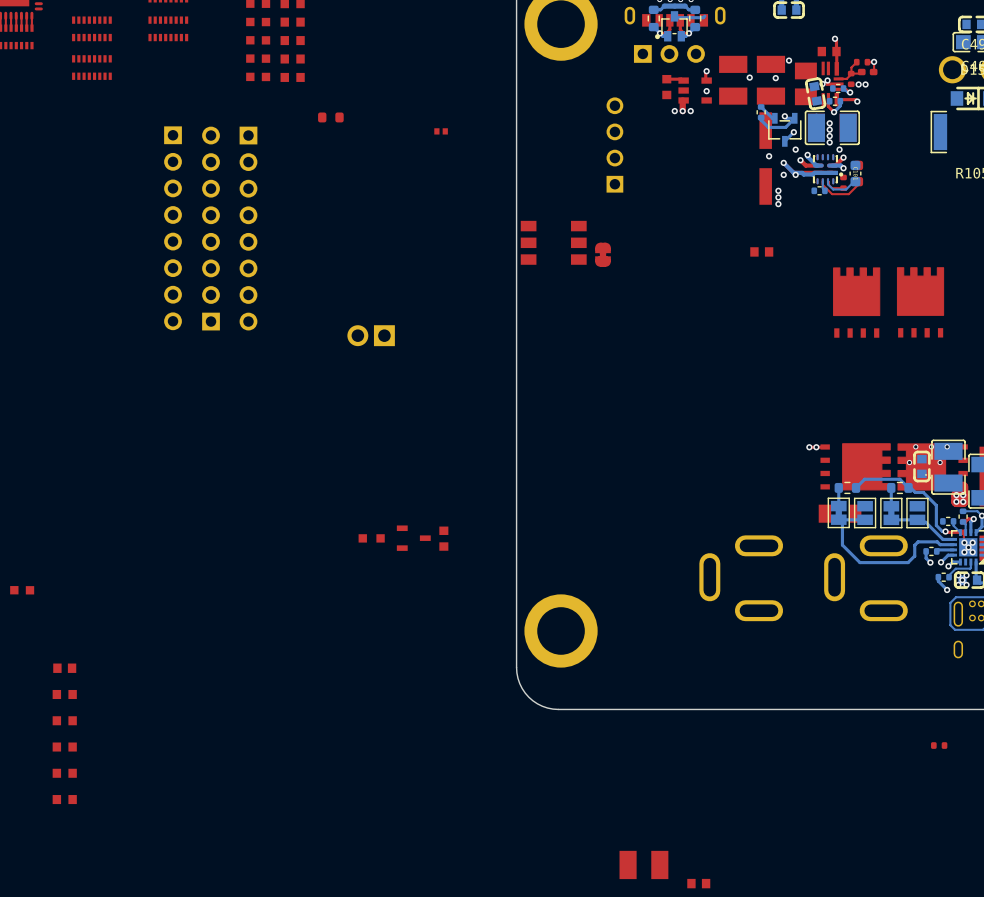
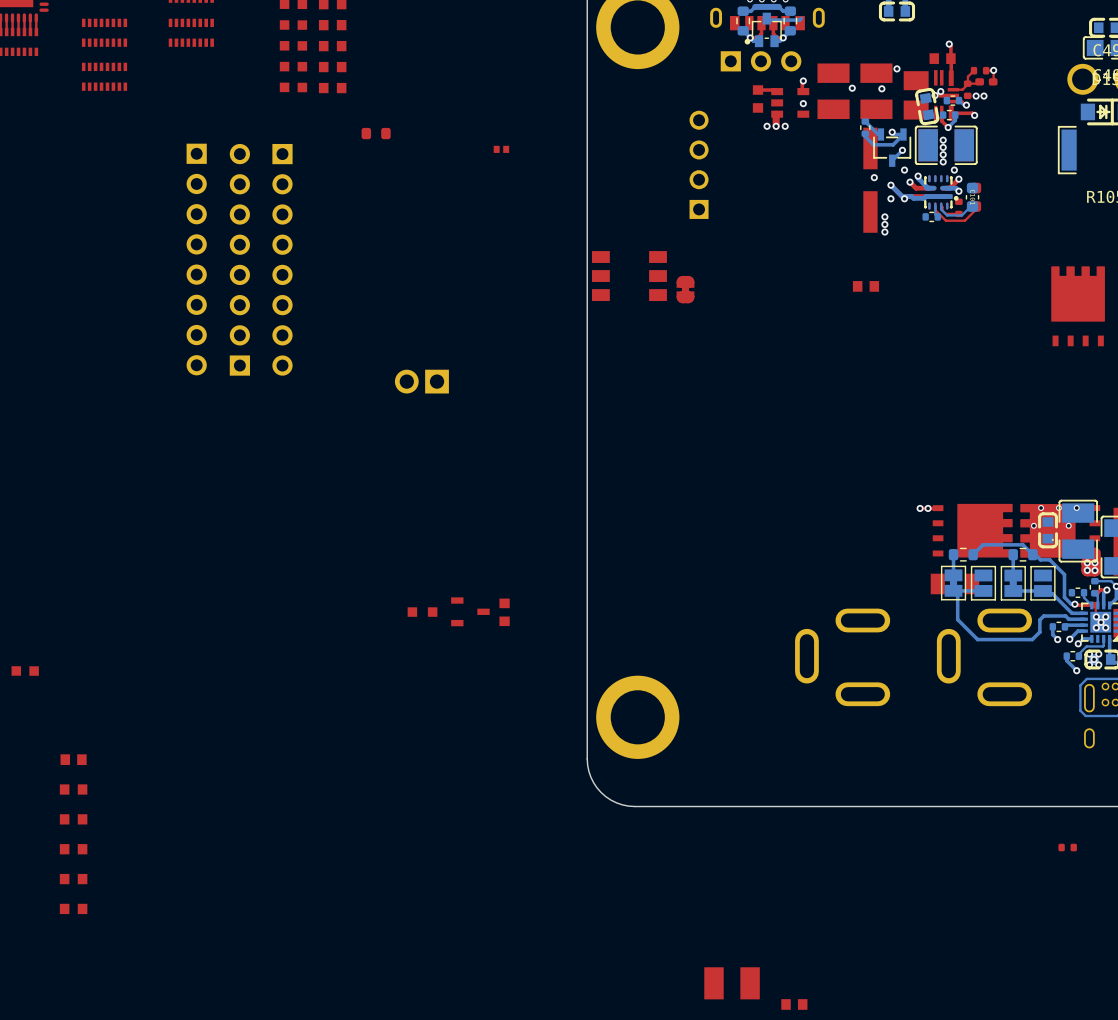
part: (856, 302) -> none
part position: (920, 302) -> (1078, 306)

